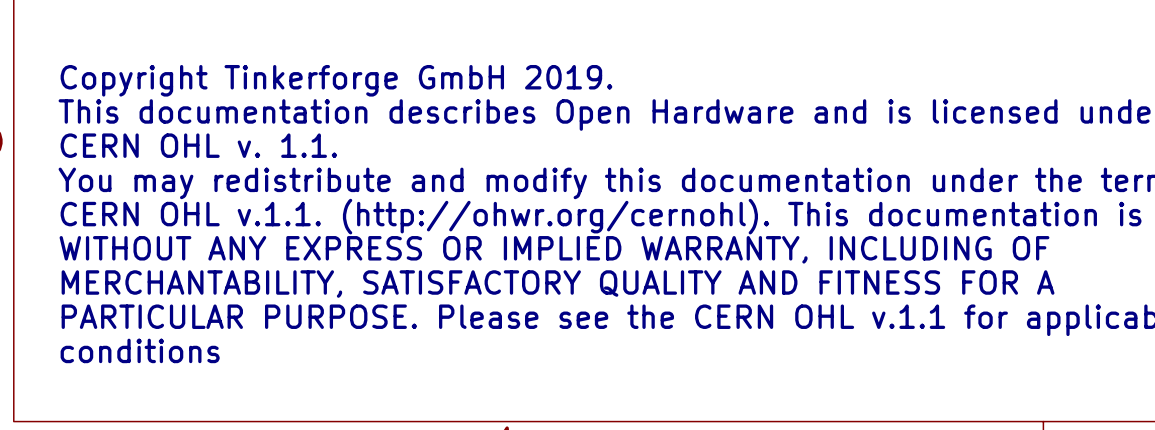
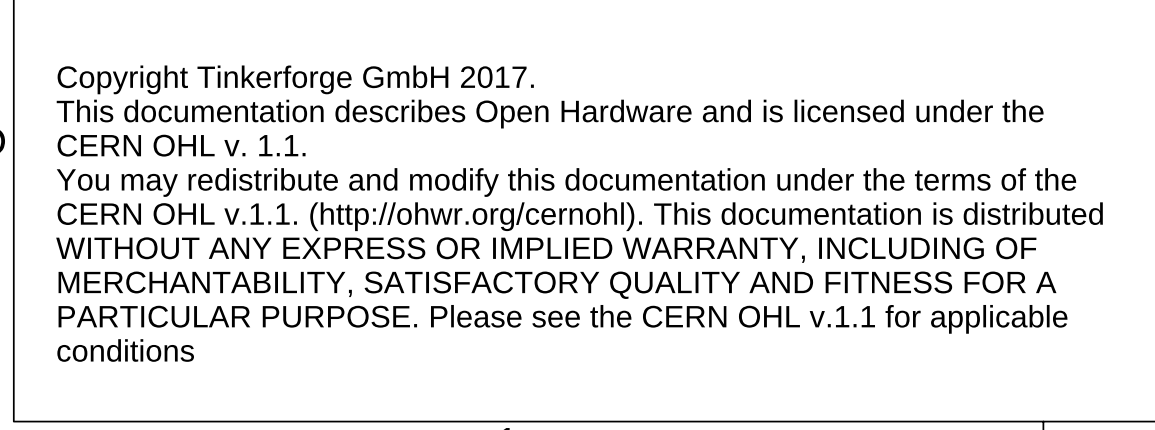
text: Copyright Tinkerforge GmbH 2019. (336, 80) -> Copyright Tinkerforge GmbH 2017. (295, 79)

